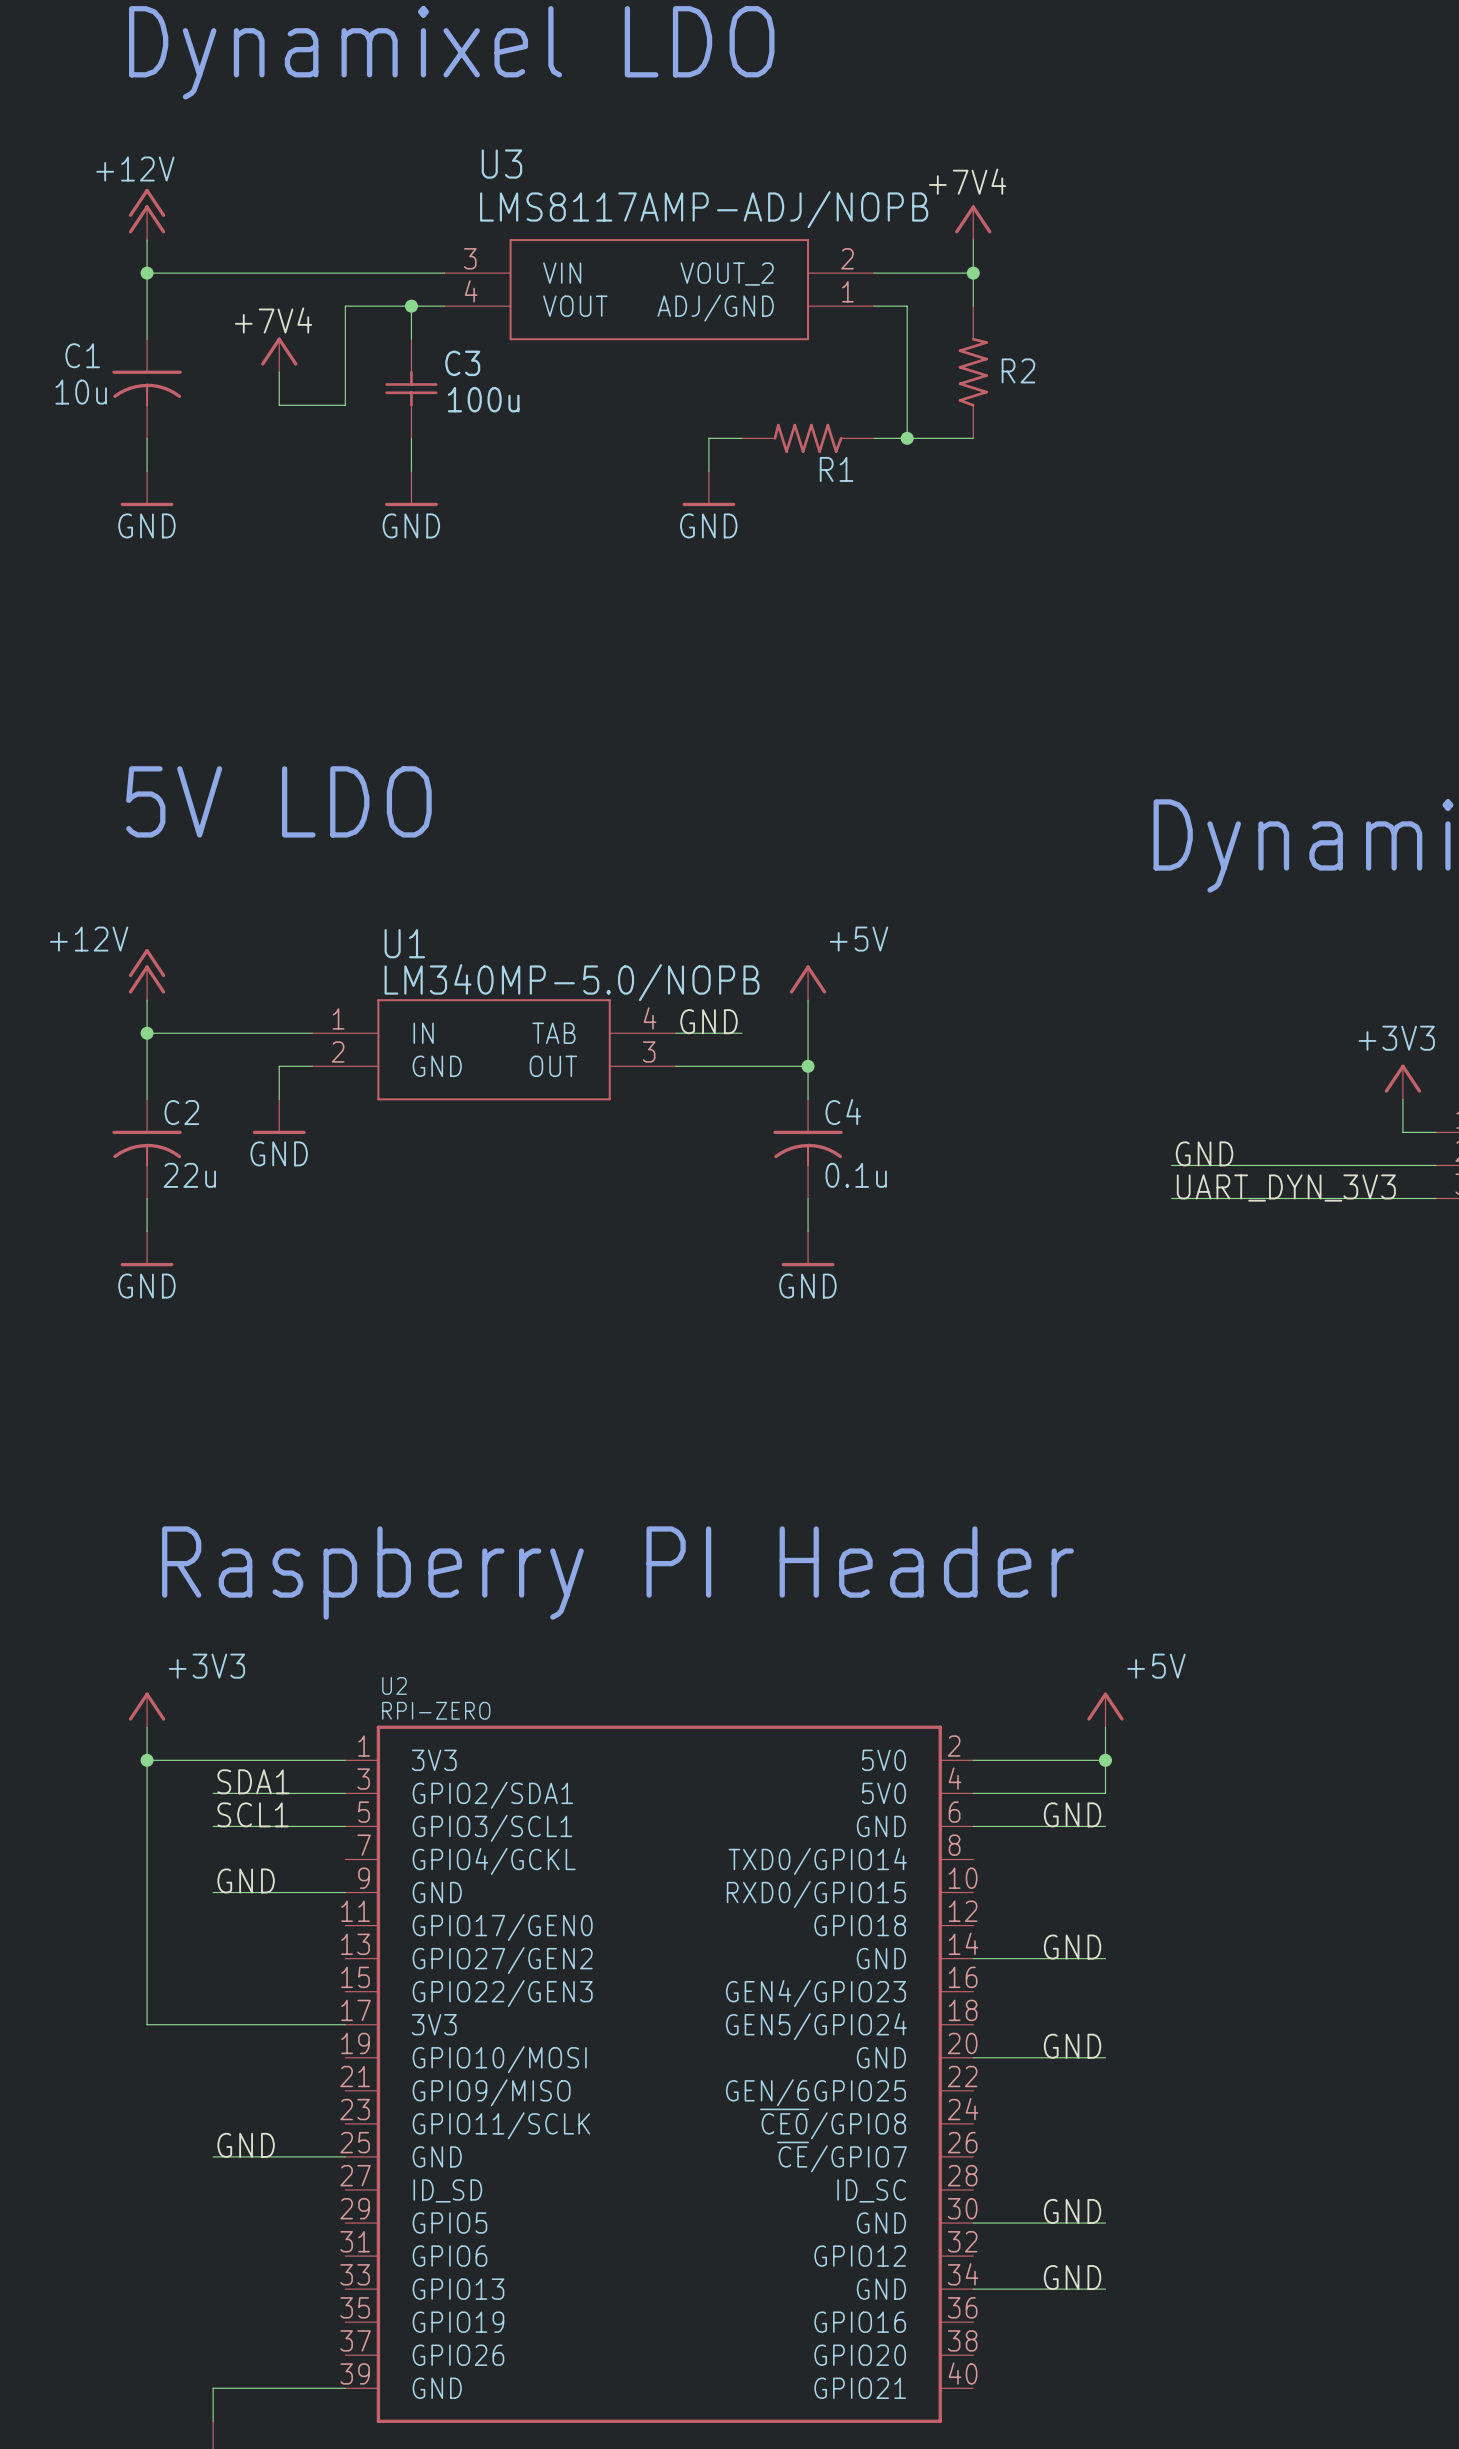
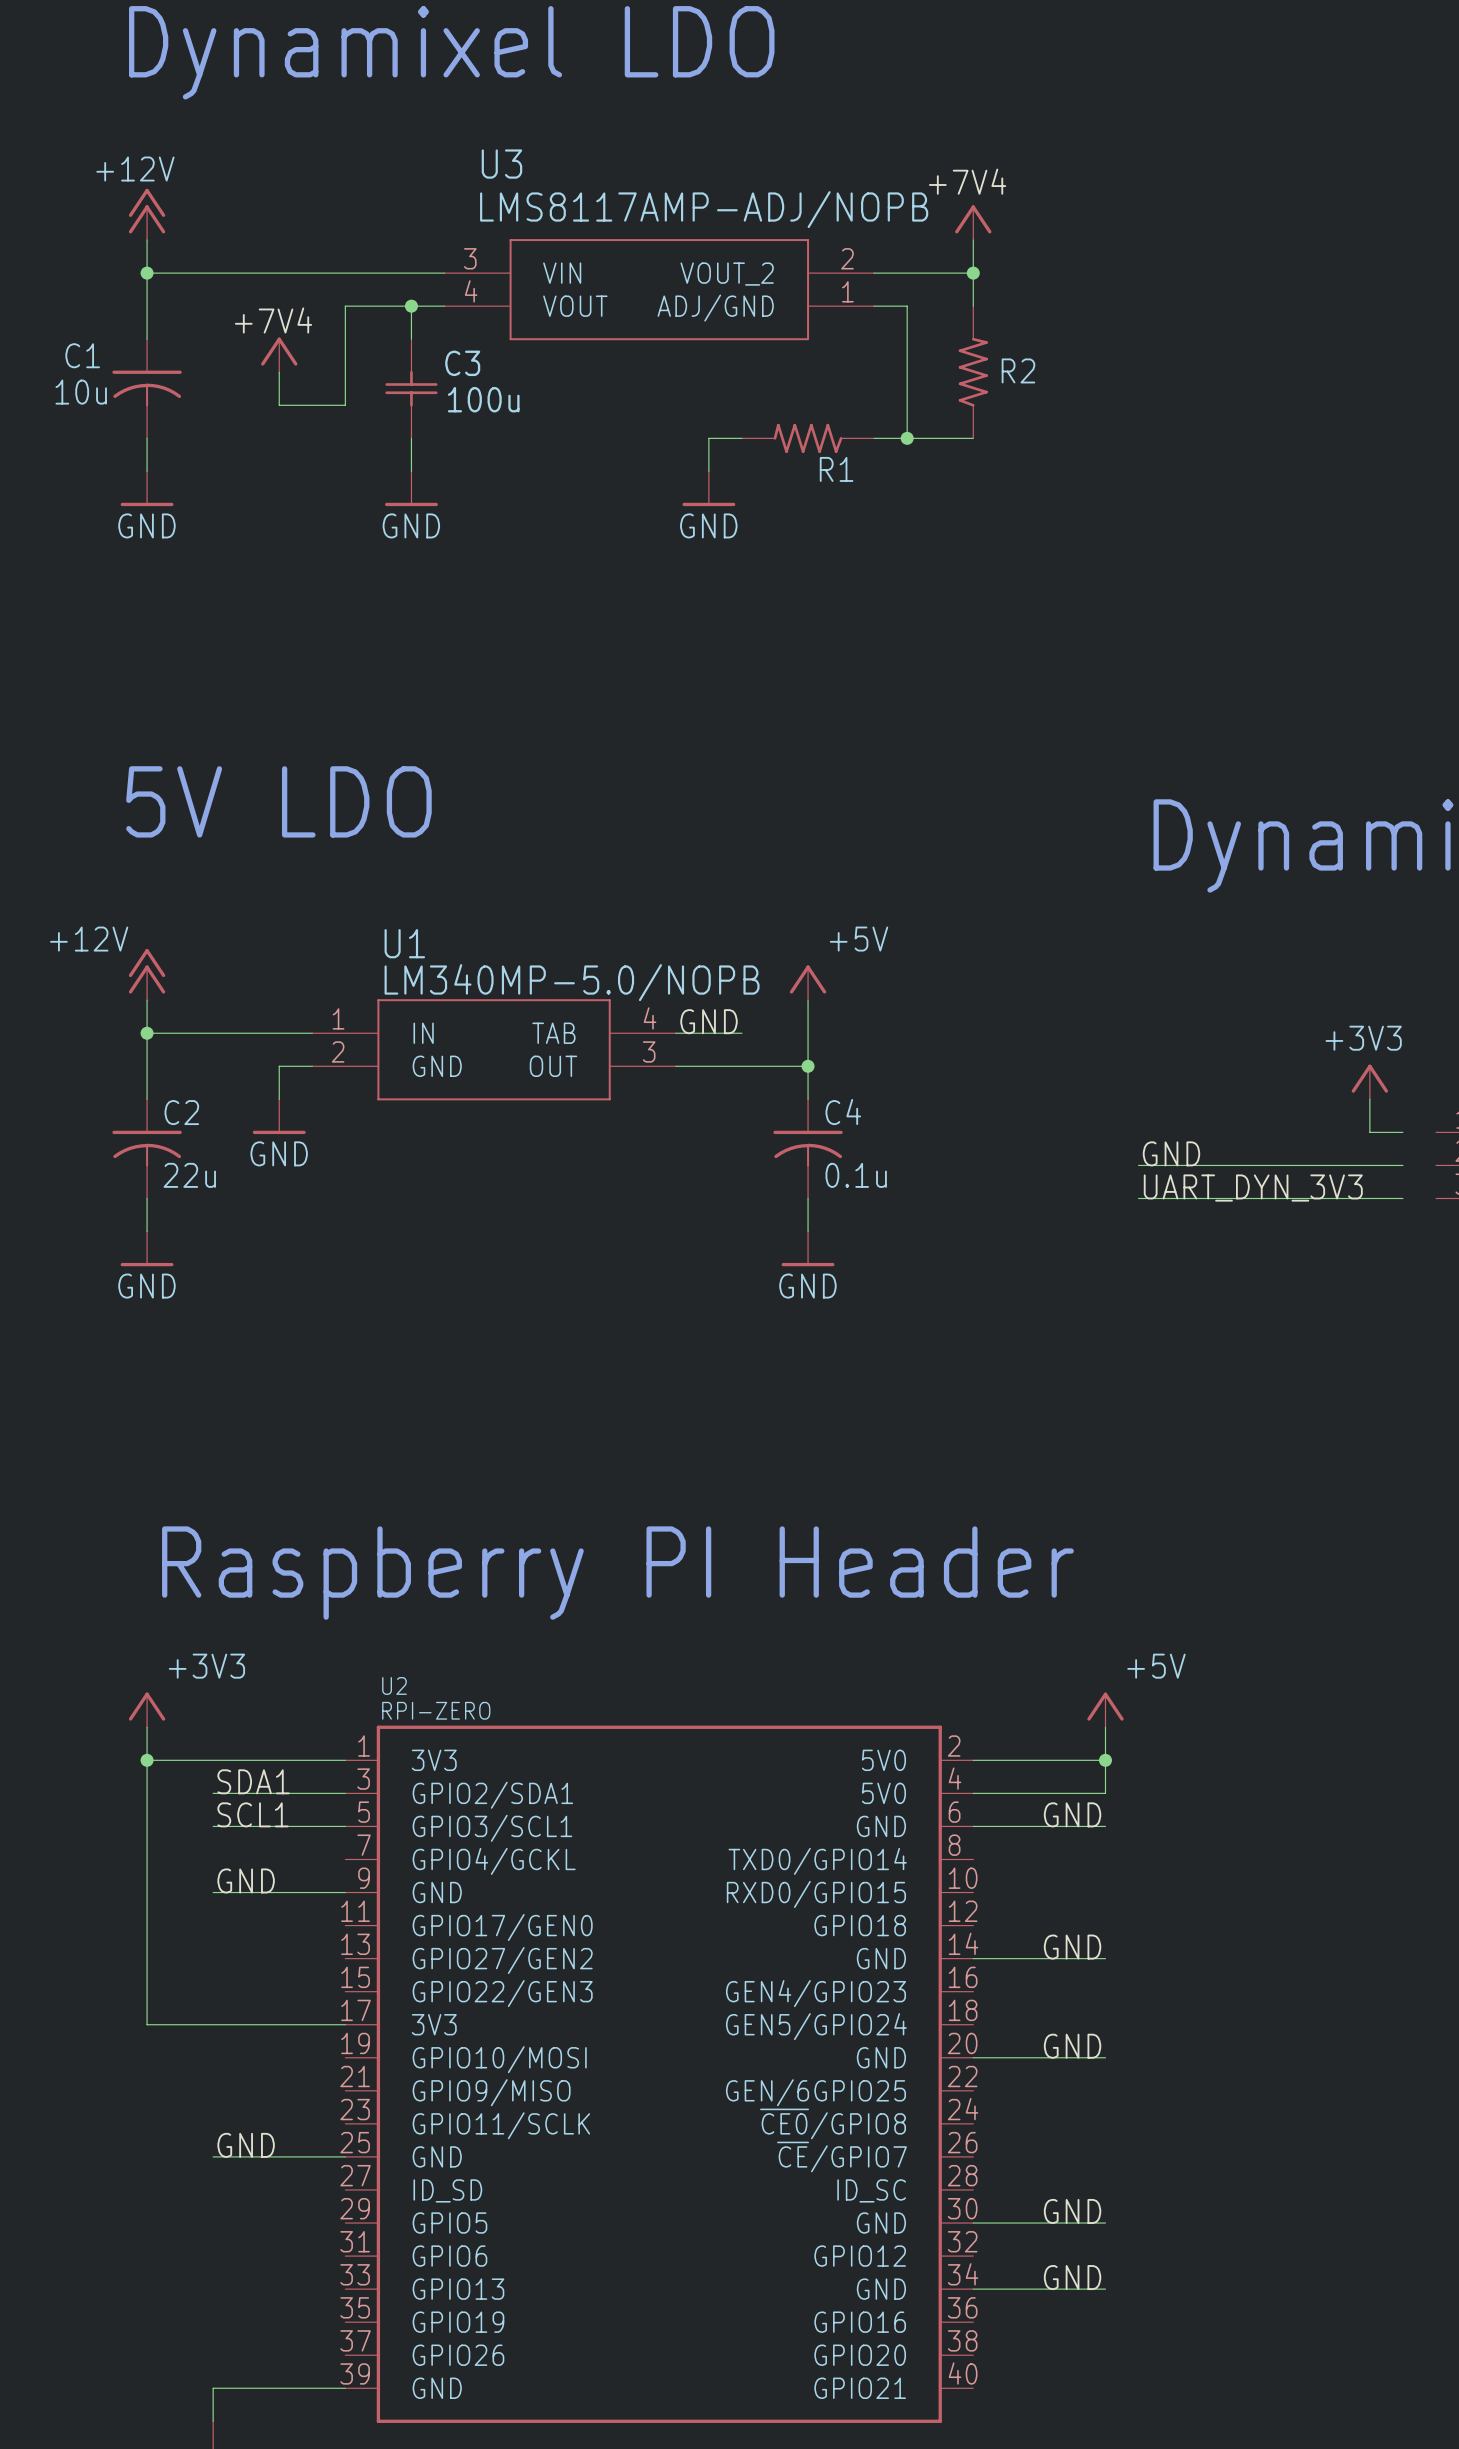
power symbol position: +3V3 (1402, 1081) -> +3V3 (1369, 1081)
wire: (1402, 1099) (1402, 1132) (1435, 1132) -> (1369, 1099) (1369, 1132) (1402, 1132)
label position: GND (1204, 1153) -> GND (1171, 1153)
wire: (1402, 1165) (1435, 1165) -> (1138, 1165) (1171, 1165)
label position: UART_DYN_3V3 (1286, 1188) -> UART_DYN_3V3 (1253, 1188)
wire: (1402, 1198) (1435, 1198) -> (1138, 1198) (1171, 1198)

